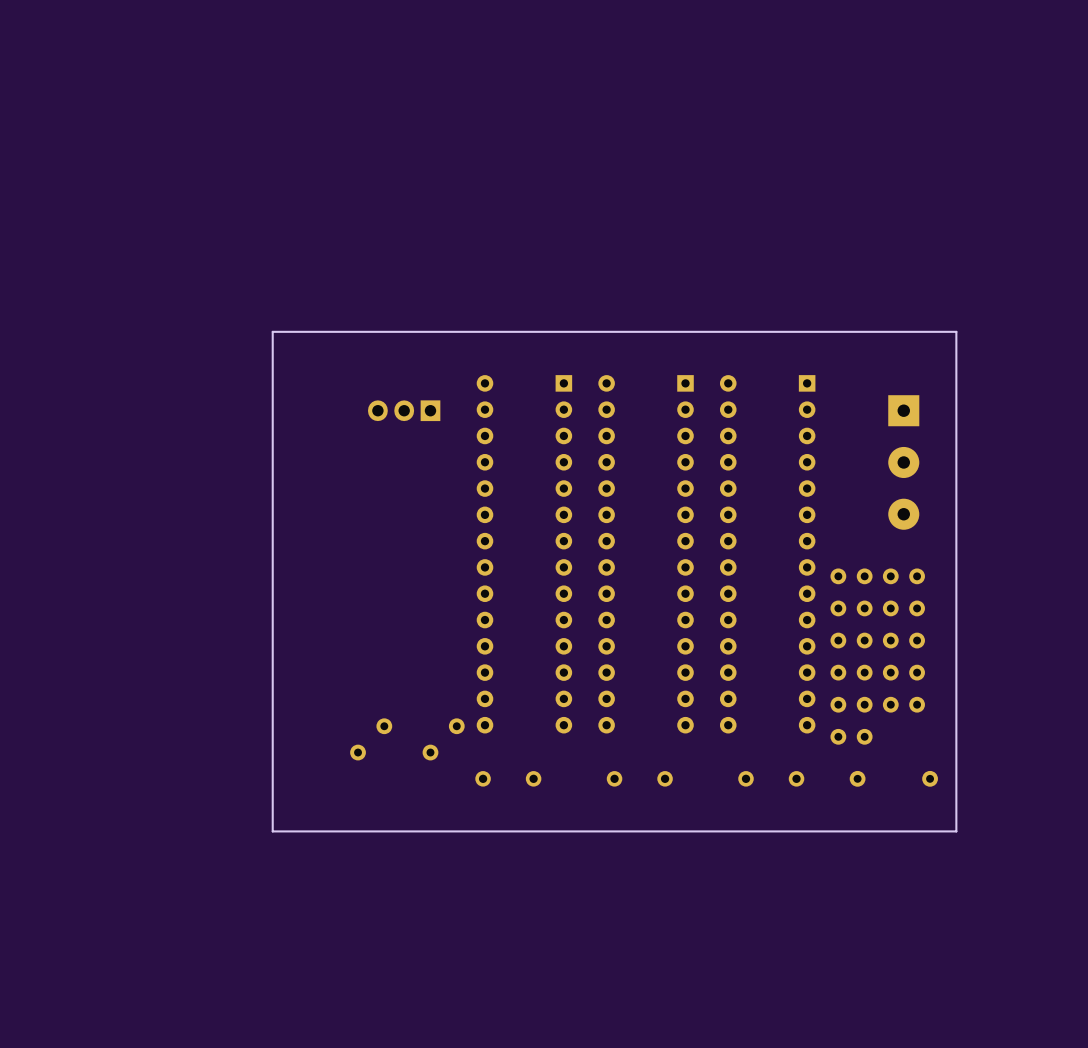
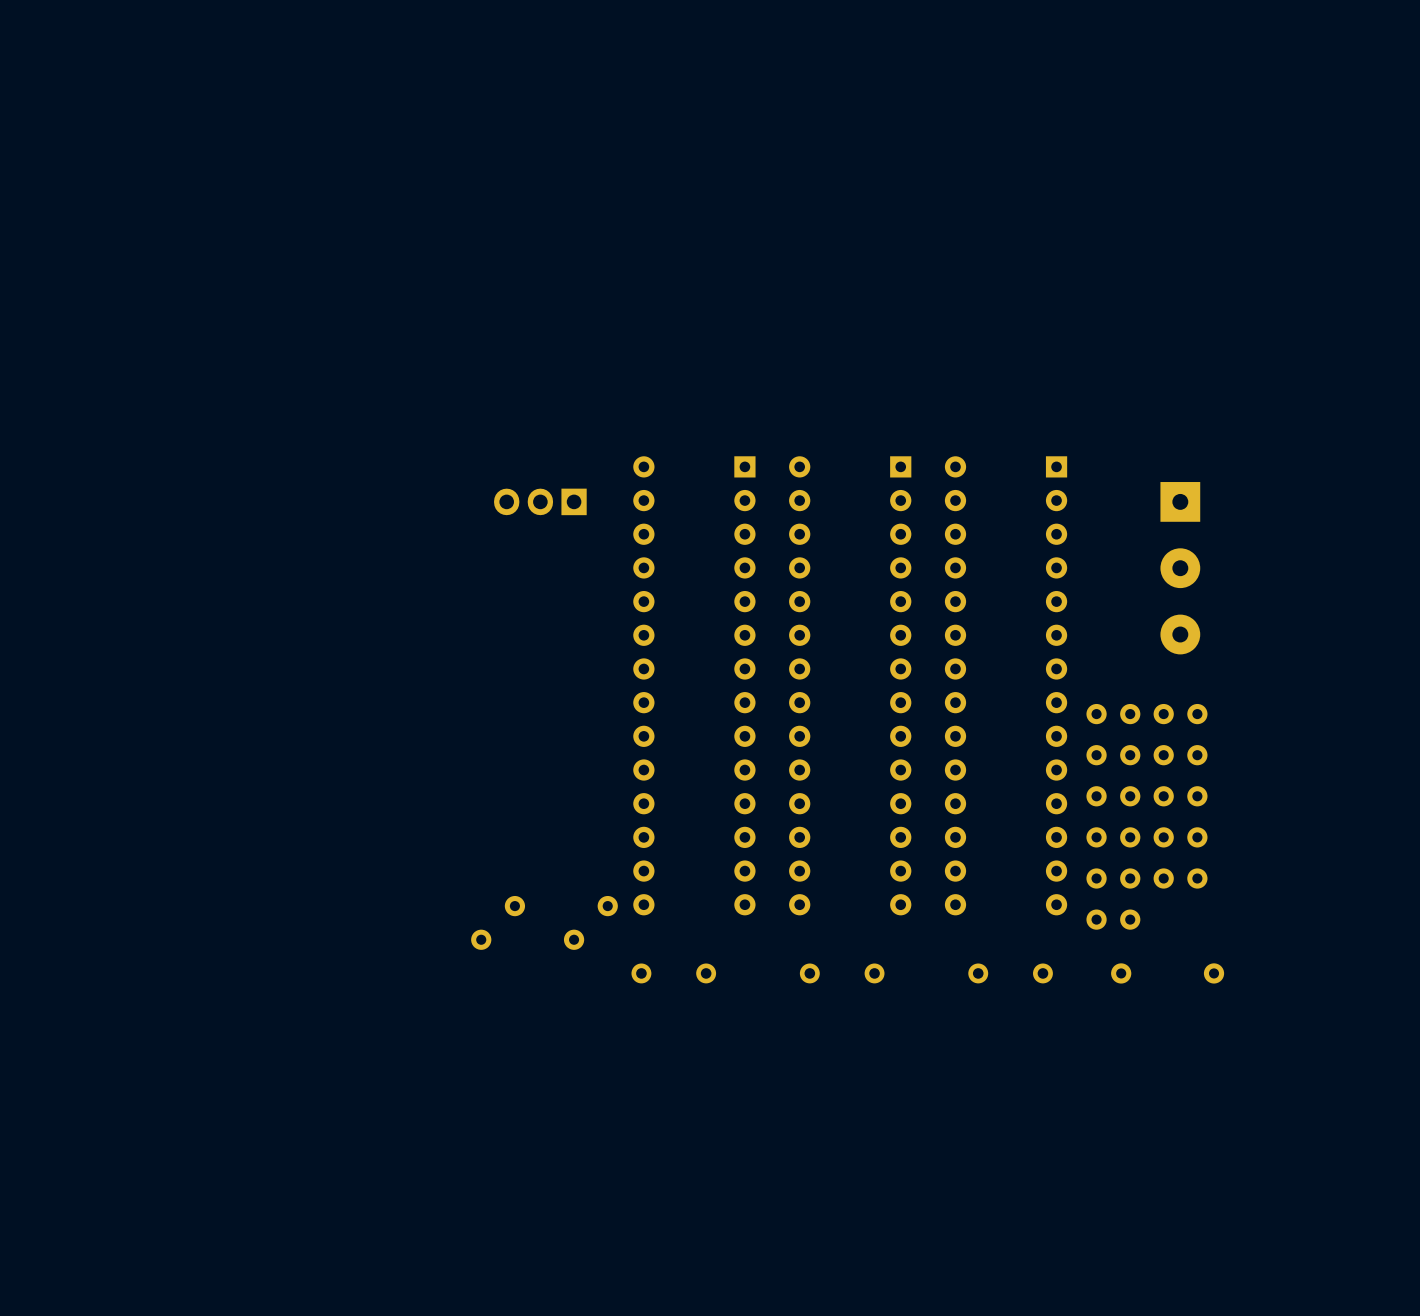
board edge: (956, 331) (272, 331) (272, 831) (956, 831) (956, 331) -> none

